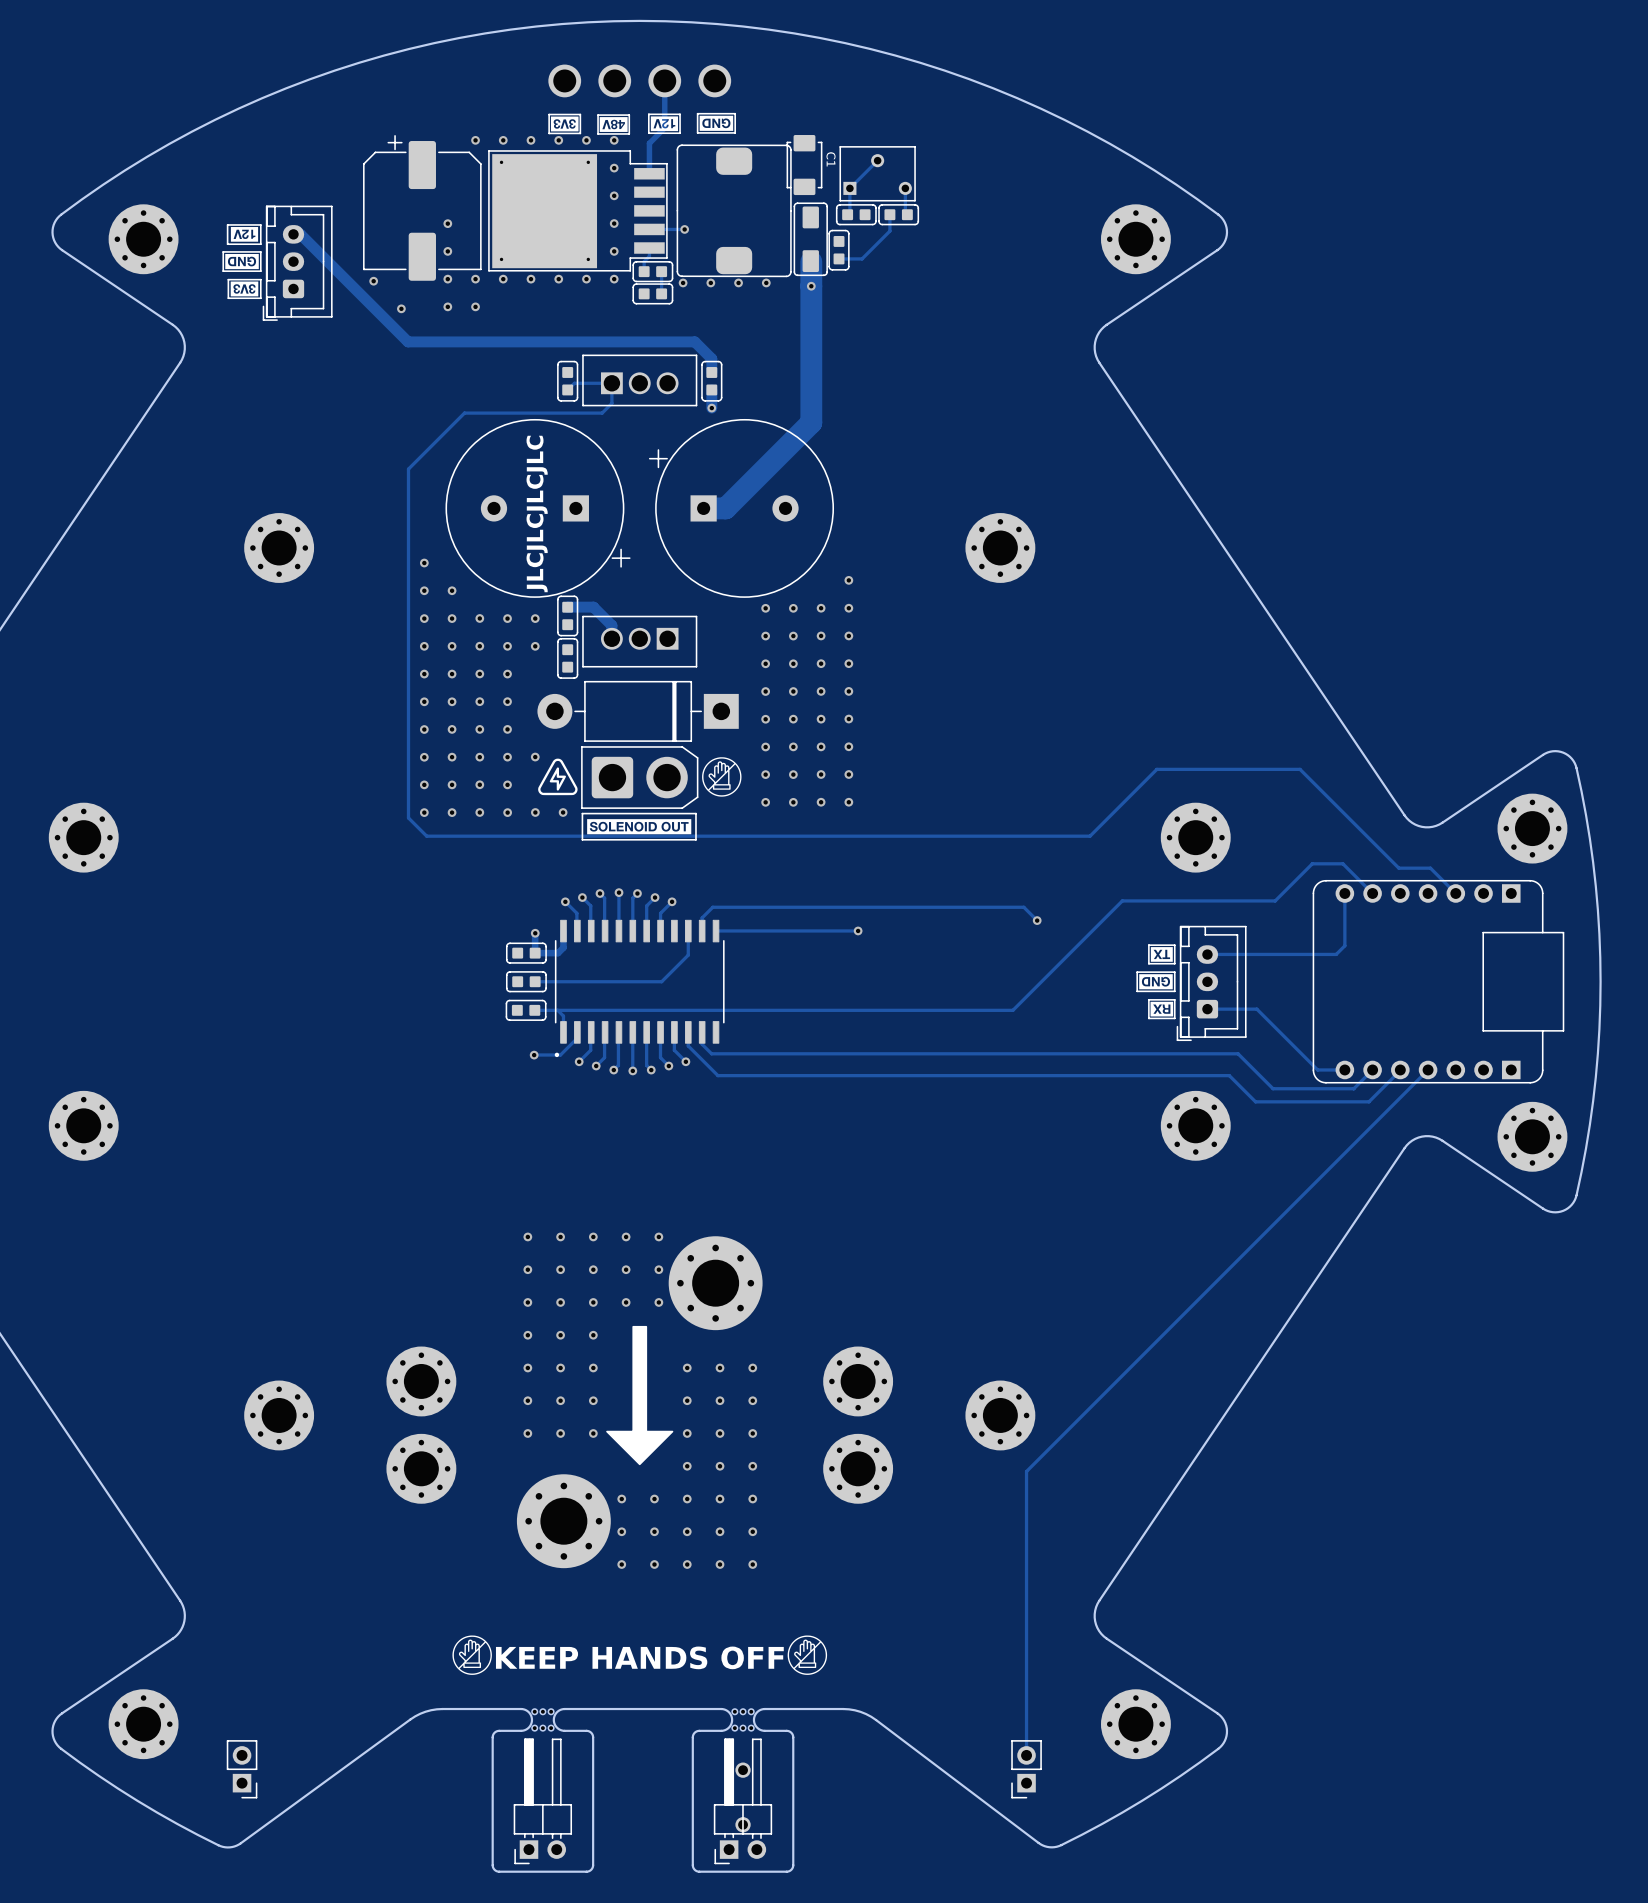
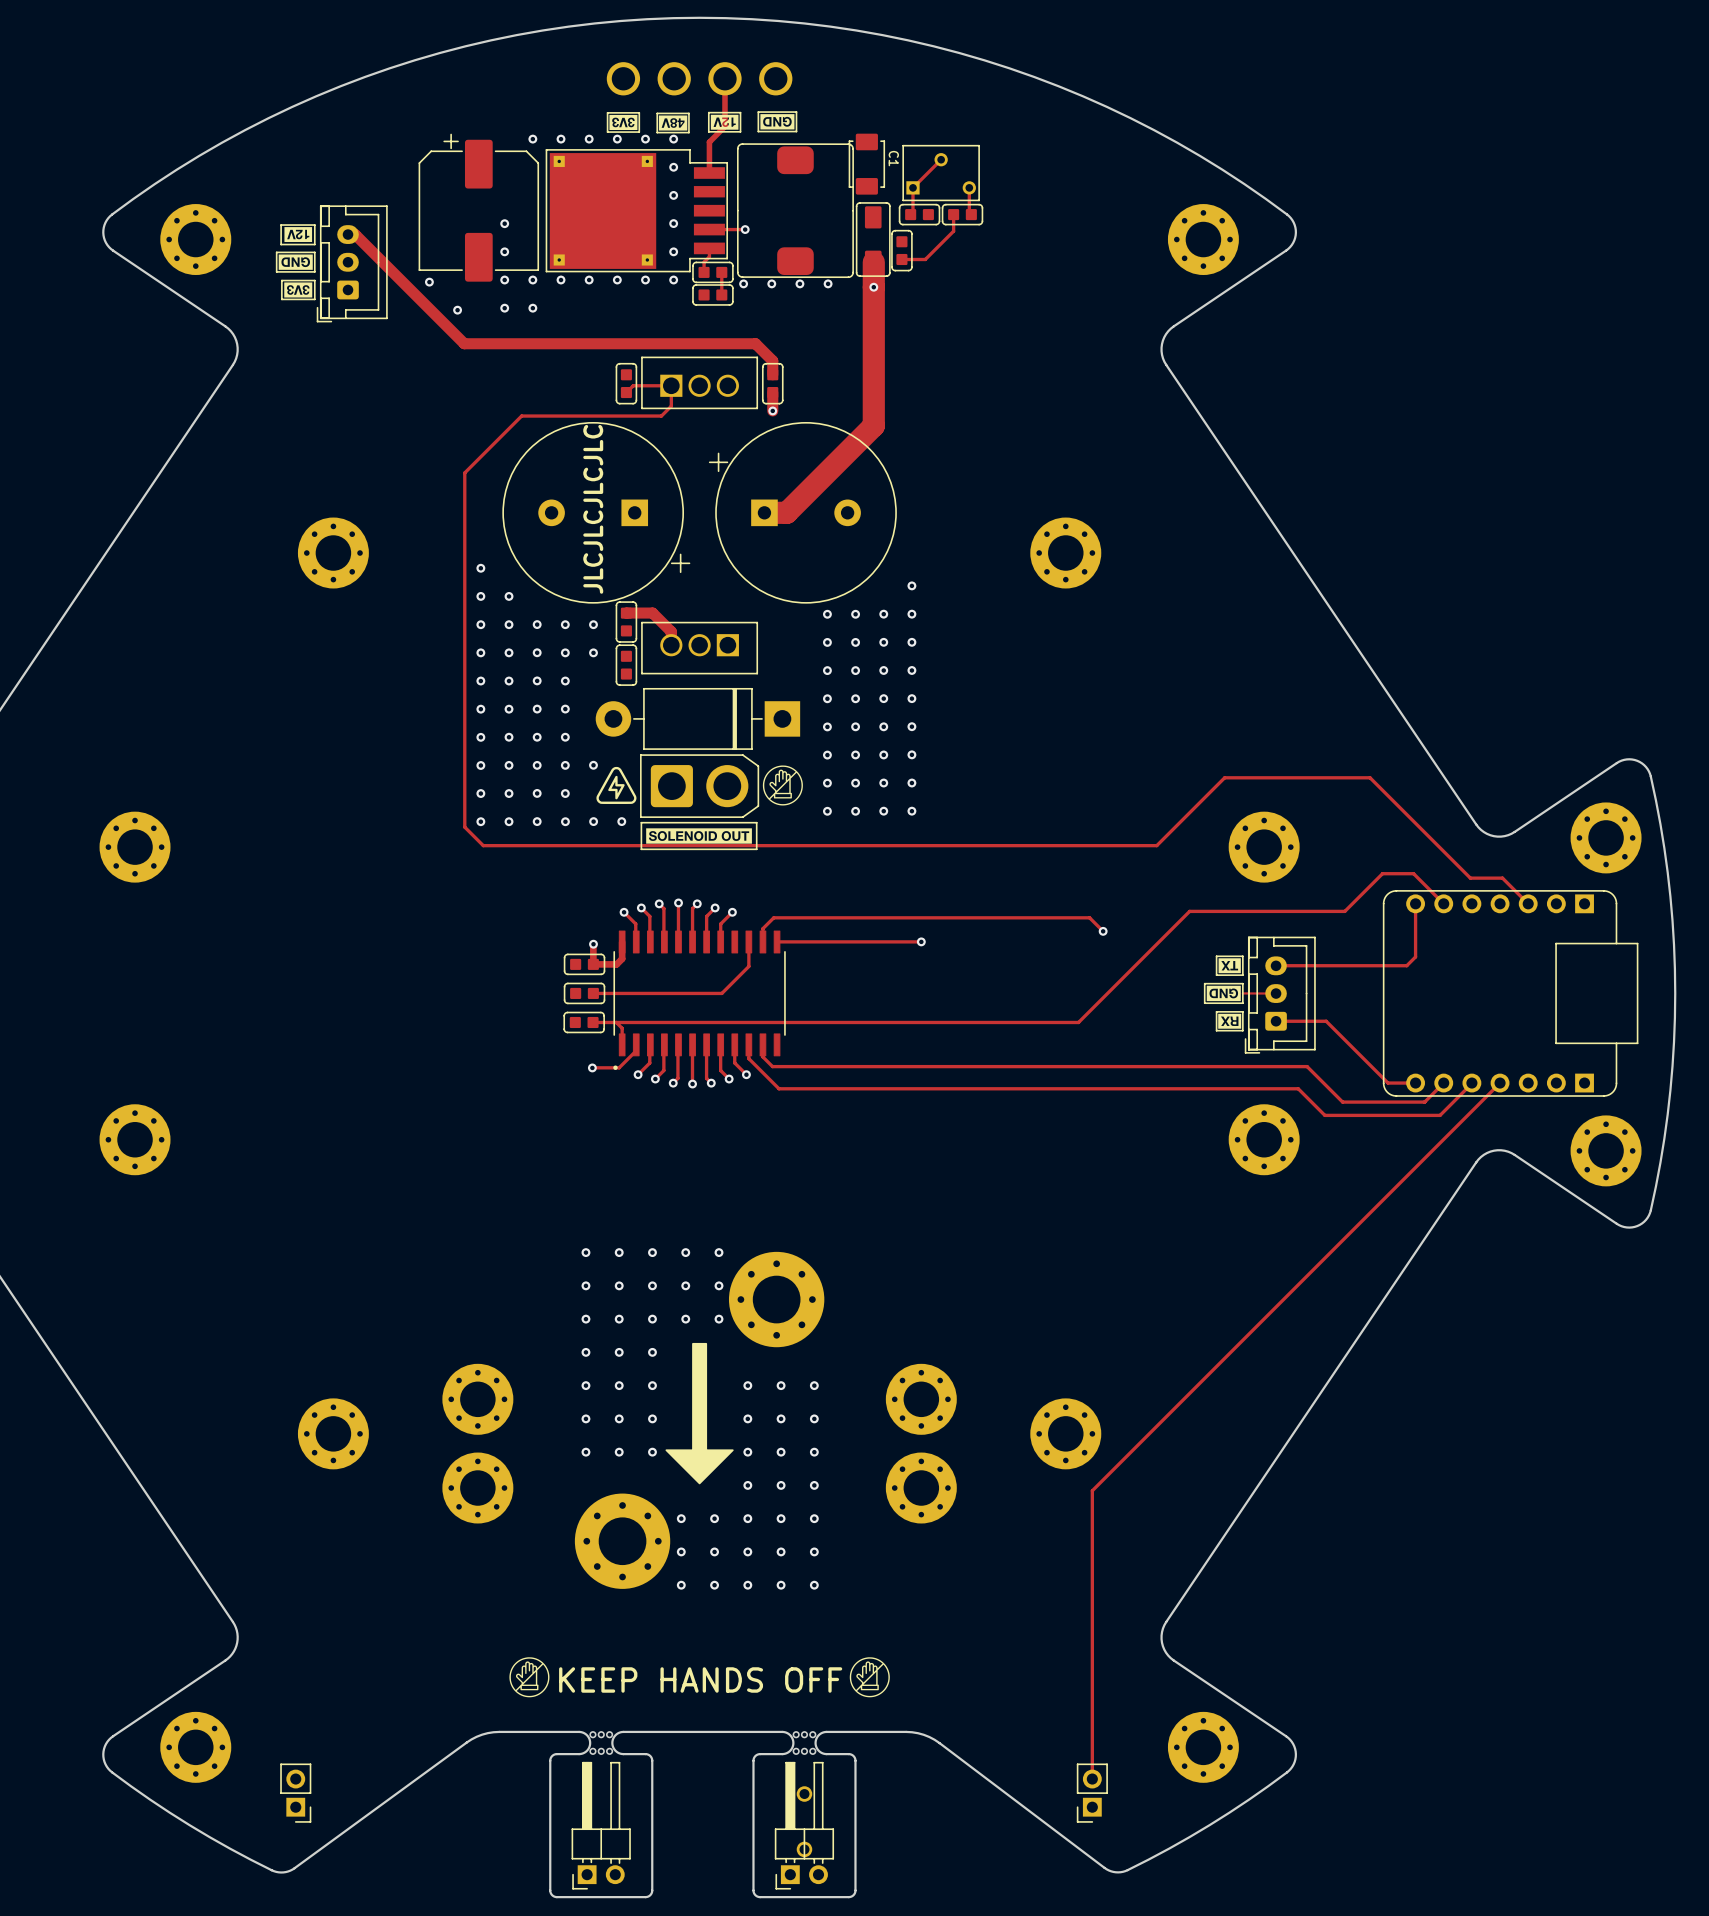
track: none -> (1242, 993) (1276, 993)

